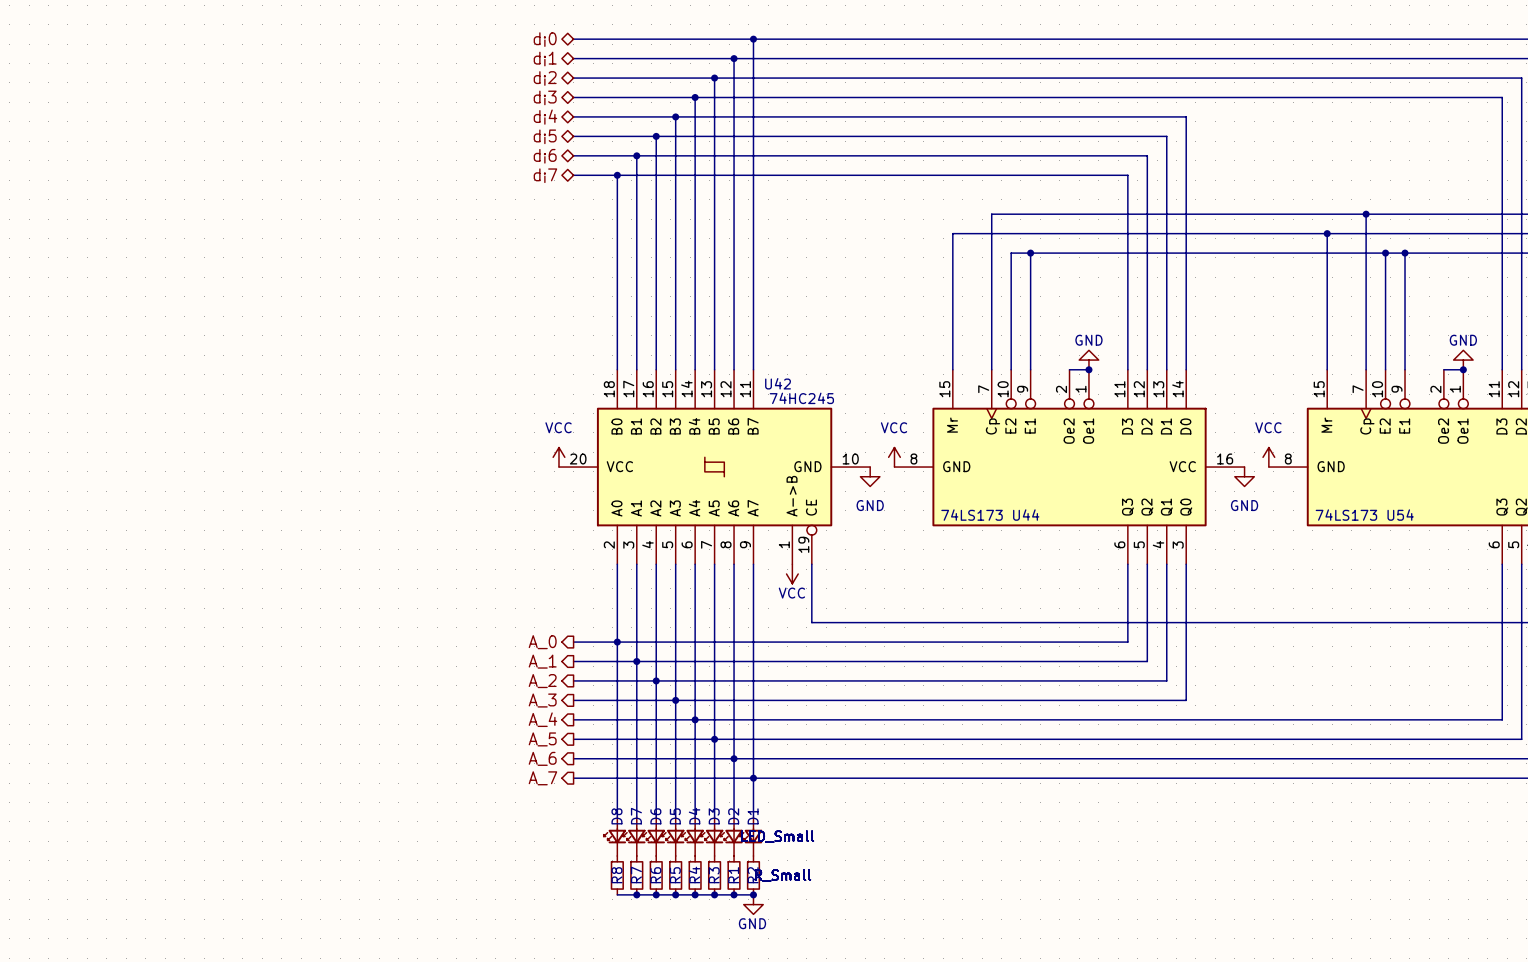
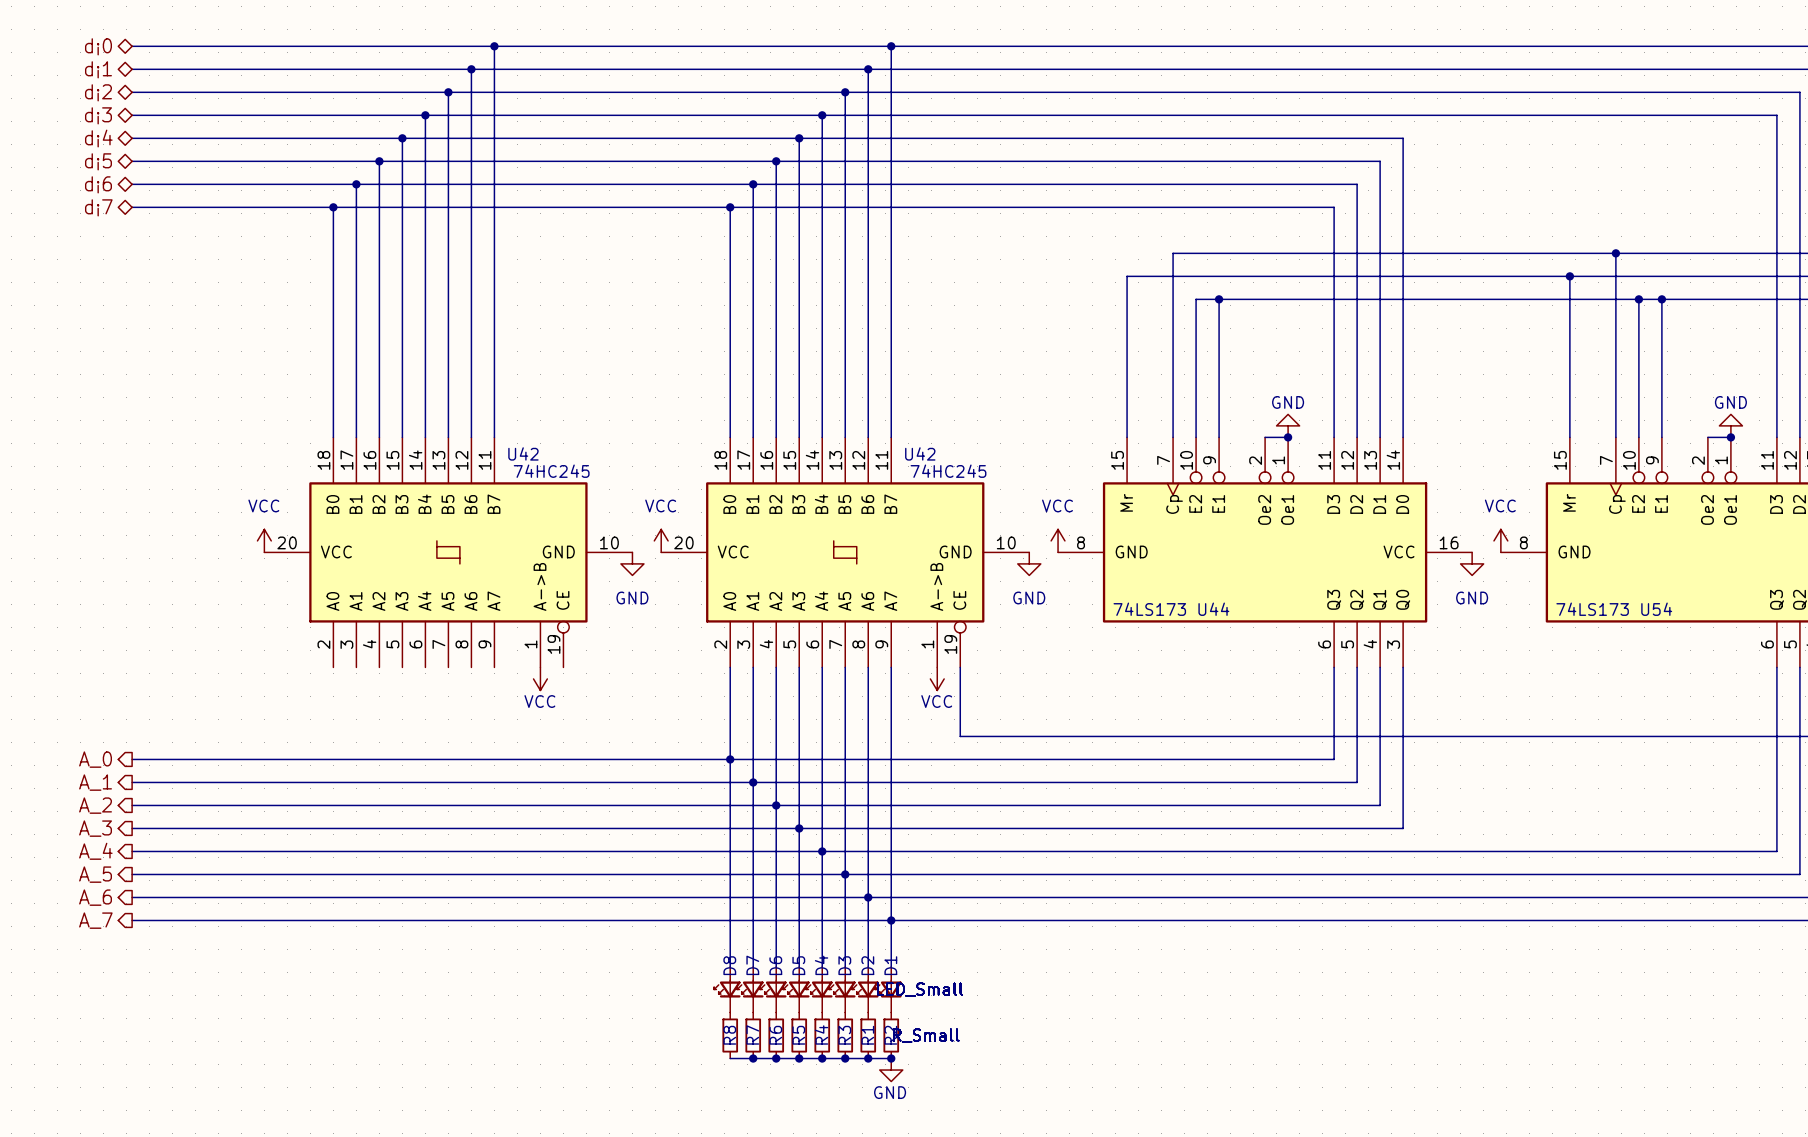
hierarchical label: none -> di0 (98, 46)
wire: none -> (132, 46) (678, 46)
wire: none -> (494, 46) (494, 437)
junction: none -> (494, 46)
hierarchical label: di0 (545, 39) -> none
wire: none -> (132, 69) (678, 69)
wire: none -> (471, 69) (471, 437)
junction: none -> (471, 69)
hierarchical label: none -> di1 (98, 69)
hierarchical label: di1 (545, 59) -> none
hierarchical label: none -> di2 (98, 92)
wire: none -> (132, 92) (678, 92)
wire: none -> (448, 92) (448, 437)
junction: none -> (448, 92)
hierarchical label: di2 (545, 78) -> none
hierarchical label: none -> di3 (98, 115)
wire: none -> (132, 115) (678, 115)
wire: none -> (425, 115) (425, 437)
junction: none -> (425, 115)
hierarchical label: di3 (545, 97) -> none
wire: none -> (132, 138) (678, 138)
wire: none -> (402, 138) (402, 437)
junction: none -> (402, 138)
hierarchical label: none -> di4 (98, 138)
hierarchical label: di4 (545, 117) -> none
hierarchical label: none -> di5 (98, 161)
wire: none -> (132, 161) (678, 161)
wire: none -> (379, 161) (379, 437)
junction: none -> (379, 161)
hierarchical label: di5 (545, 136) -> none
wire: none -> (132, 184) (678, 184)
wire: none -> (356, 184) (356, 437)
junction: none -> (356, 184)
hierarchical label: none -> di6 (98, 184)
hierarchical label: di6 (545, 156) -> none
hierarchical label: none -> di7 (98, 207)
wire: none -> (132, 207) (678, 207)
wire: none -> (333, 207) (333, 437)
junction: none -> (333, 207)
hierarchical label: di7 (545, 175) -> none
power symbol: none -> VCC (264, 540)
U42: none -> 74HC245 (448, 552)
power symbol: none -> GND (632, 563)
power symbol: none -> VCC (540, 678)
hierarchical label: none -> A_0 (95, 759)
wire: none -> (132, 759) (678, 759)
hierarchical label: A_0 (542, 642) -> none
hierarchical label: none -> A_1 (95, 782)
wire: none -> (132, 782) (678, 782)
hierarchical label: A_1 (542, 661) -> none
wire: none -> (132, 805) (678, 805)
hierarchical label: none -> A_2 (95, 805)
hierarchical label: A_2 (542, 681) -> none
hierarchical label: none -> A_3 (95, 828)
wire: none -> (132, 828) (678, 828)
hierarchical label: A_3 (542, 700) -> none
hierarchical label: none -> A_4 (95, 851)
wire: none -> (132, 851) (678, 851)
hierarchical label: A_4 (542, 719) -> none
hierarchical label: none -> A_5 (95, 874)
wire: none -> (132, 874) (678, 874)
hierarchical label: A_5 (542, 739) -> none
hierarchical label: none -> A_6 (95, 897)
wire: none -> (132, 897) (678, 897)
hierarchical label: A_6 (542, 758) -> none
hierarchical label: none -> A_7 (95, 920)
wire: none -> (132, 920) (678, 920)
hierarchical label: A_7 (542, 778) -> none

